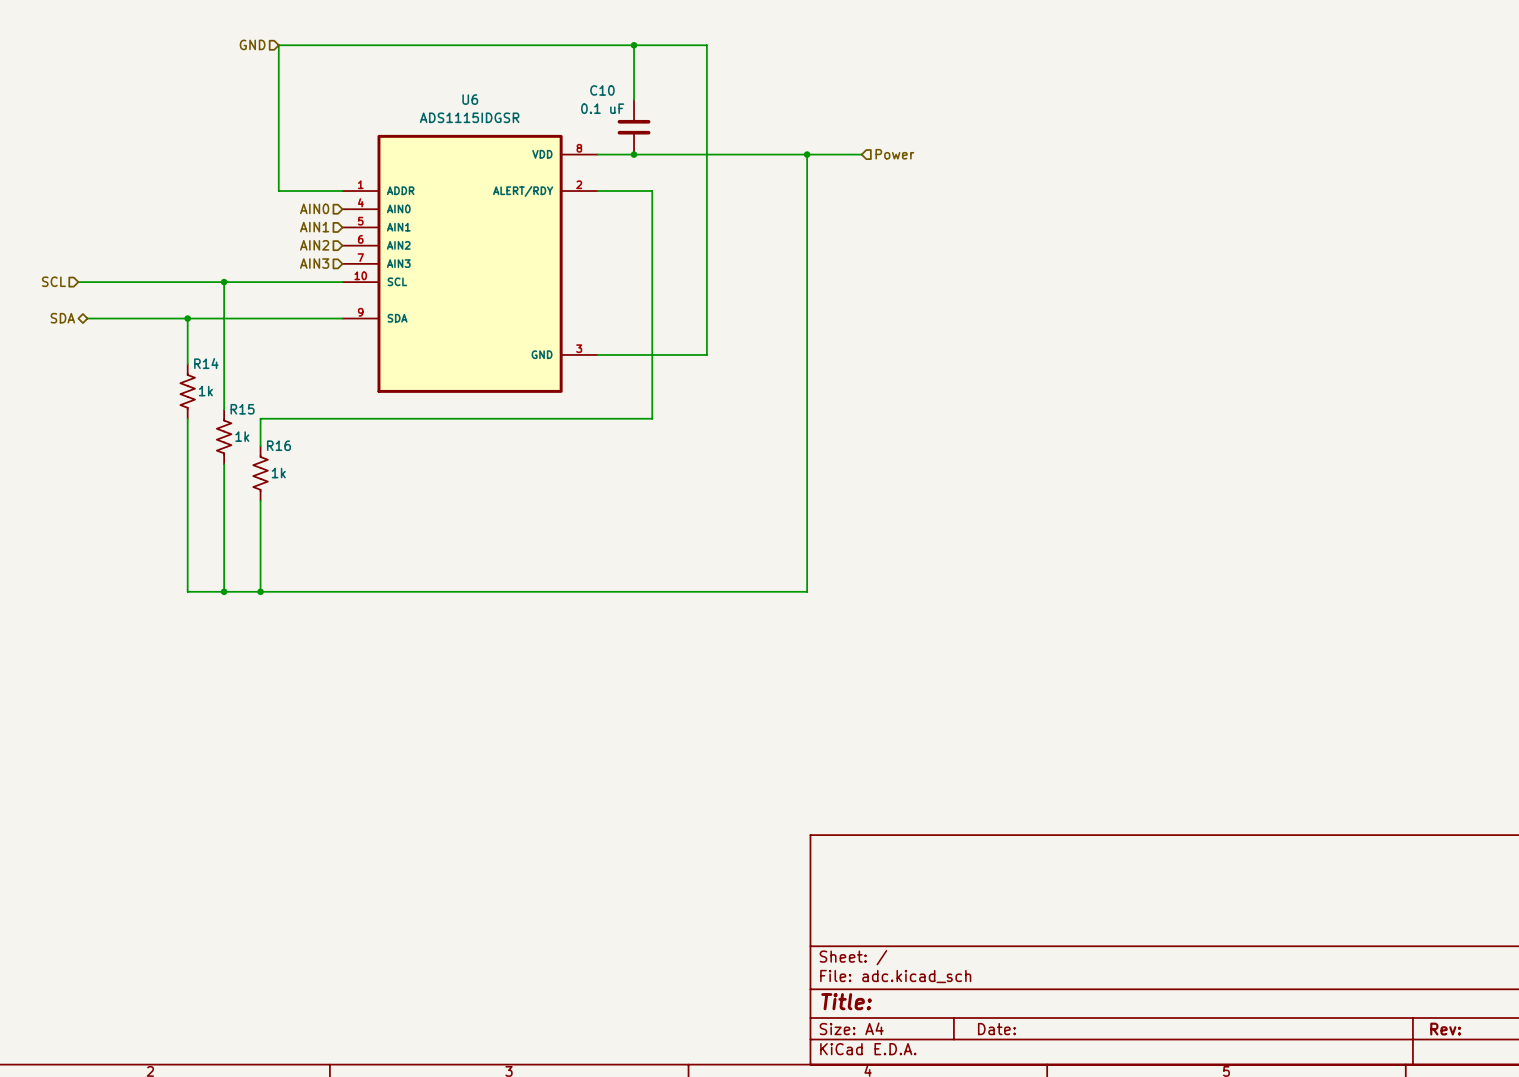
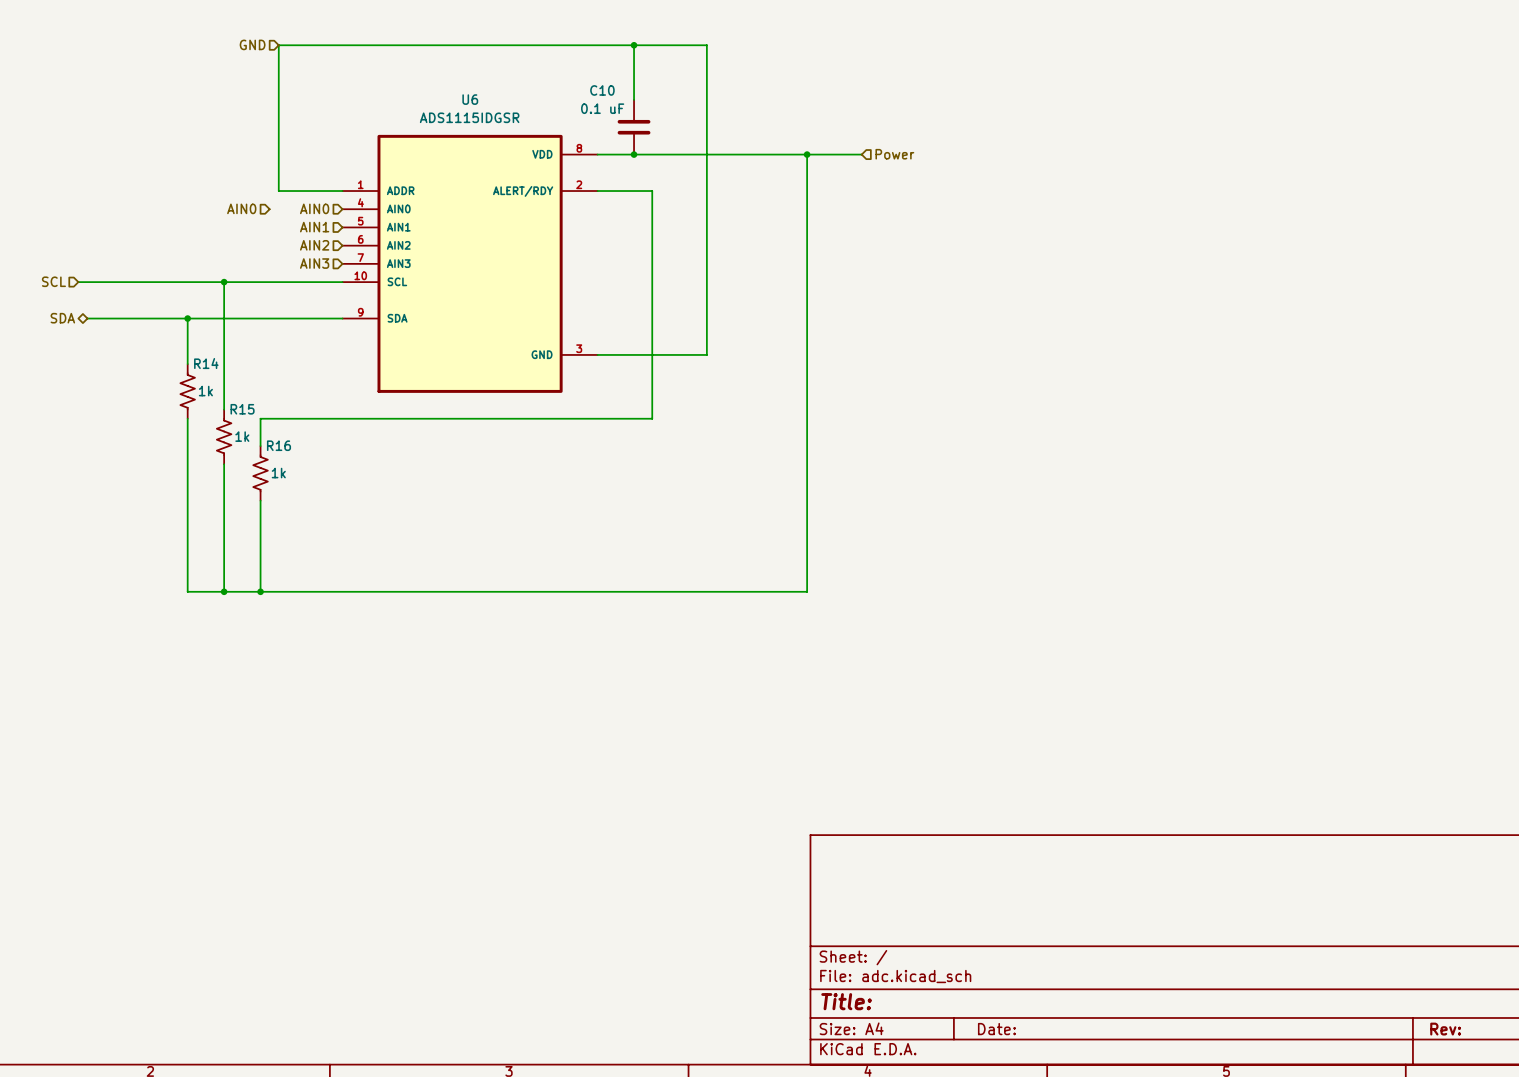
hierarchical label: none -> AIN0 (241, 208)

